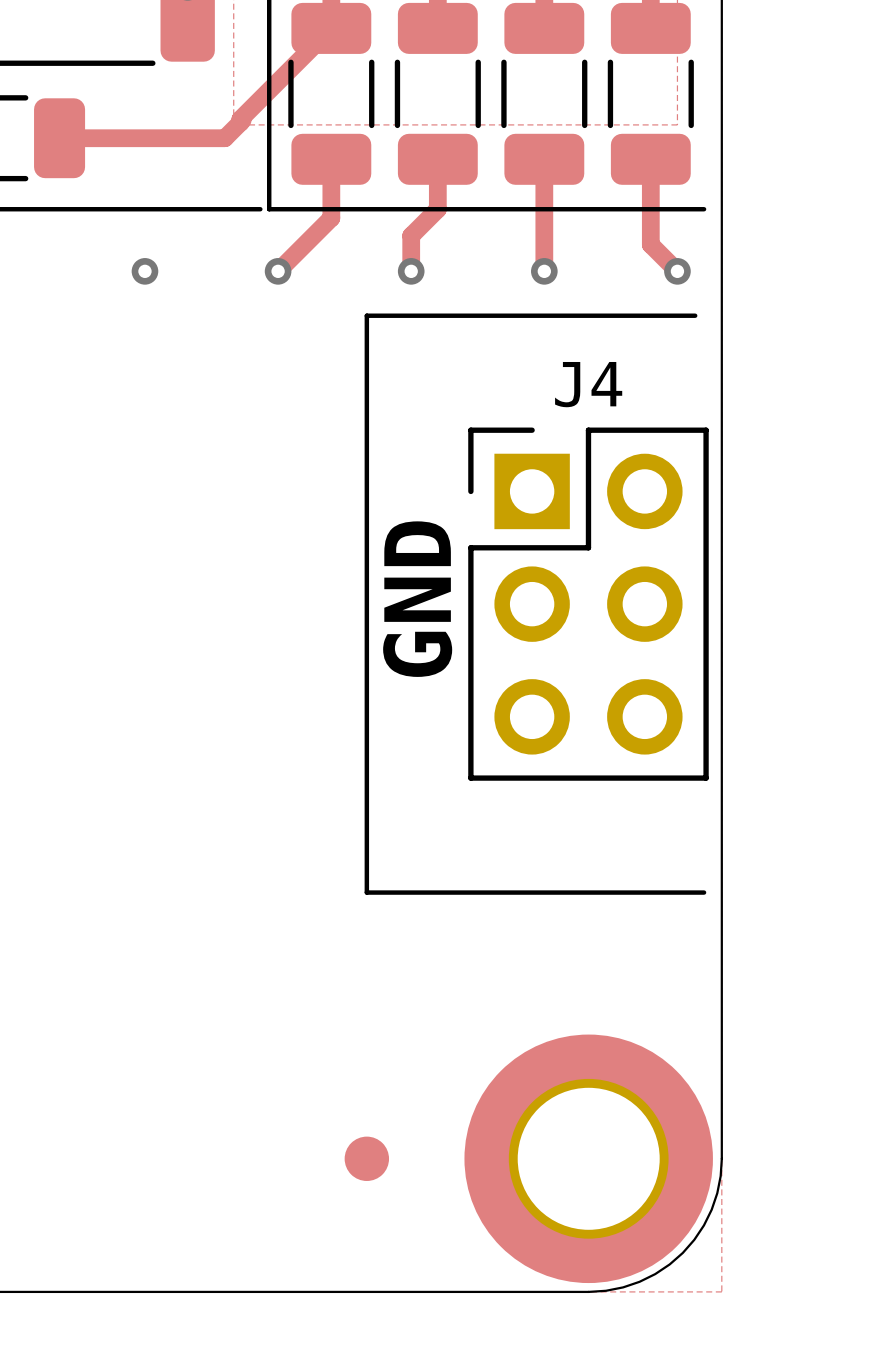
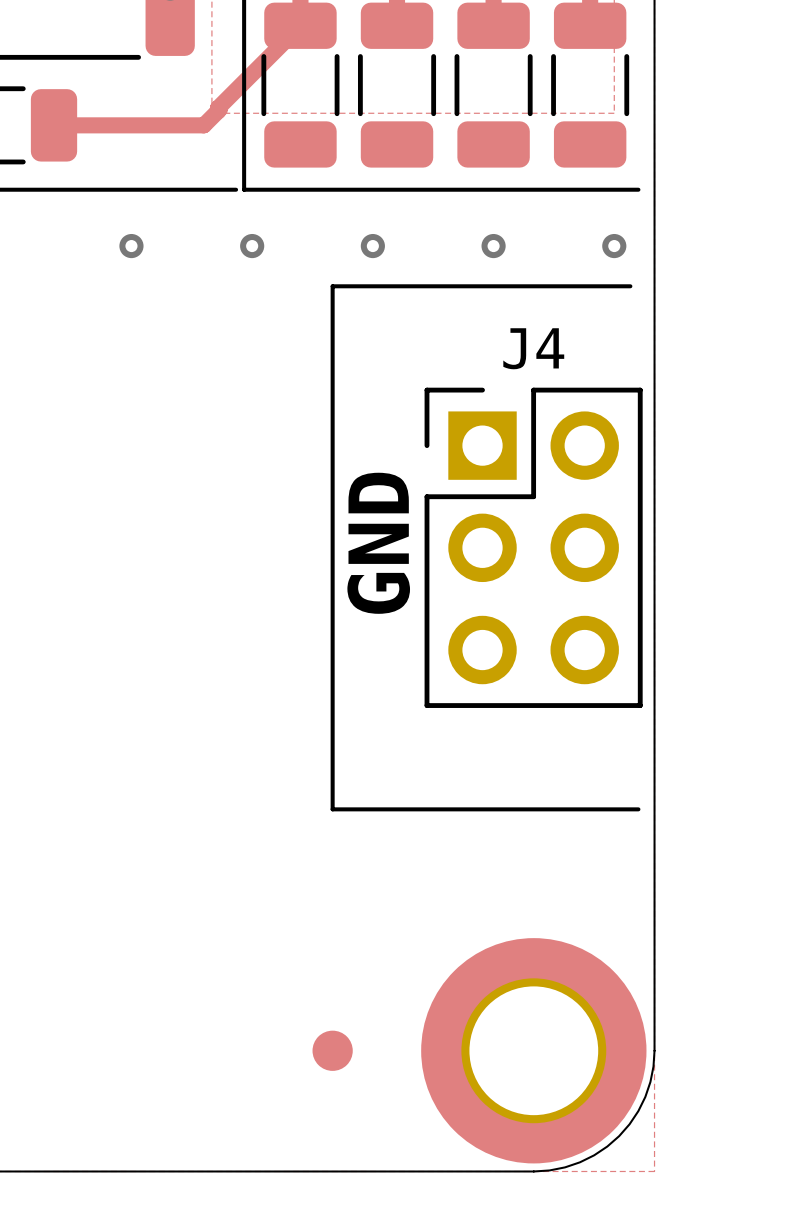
track: (544, 157) (544, 271) -> none
track: (331, 159) (331, 218) (278, 271) -> none
track: (437, 159) (437, 209) (411, 235) (411, 271) -> none
track: (650, 159) (650, 244) (677, 271) -> none

